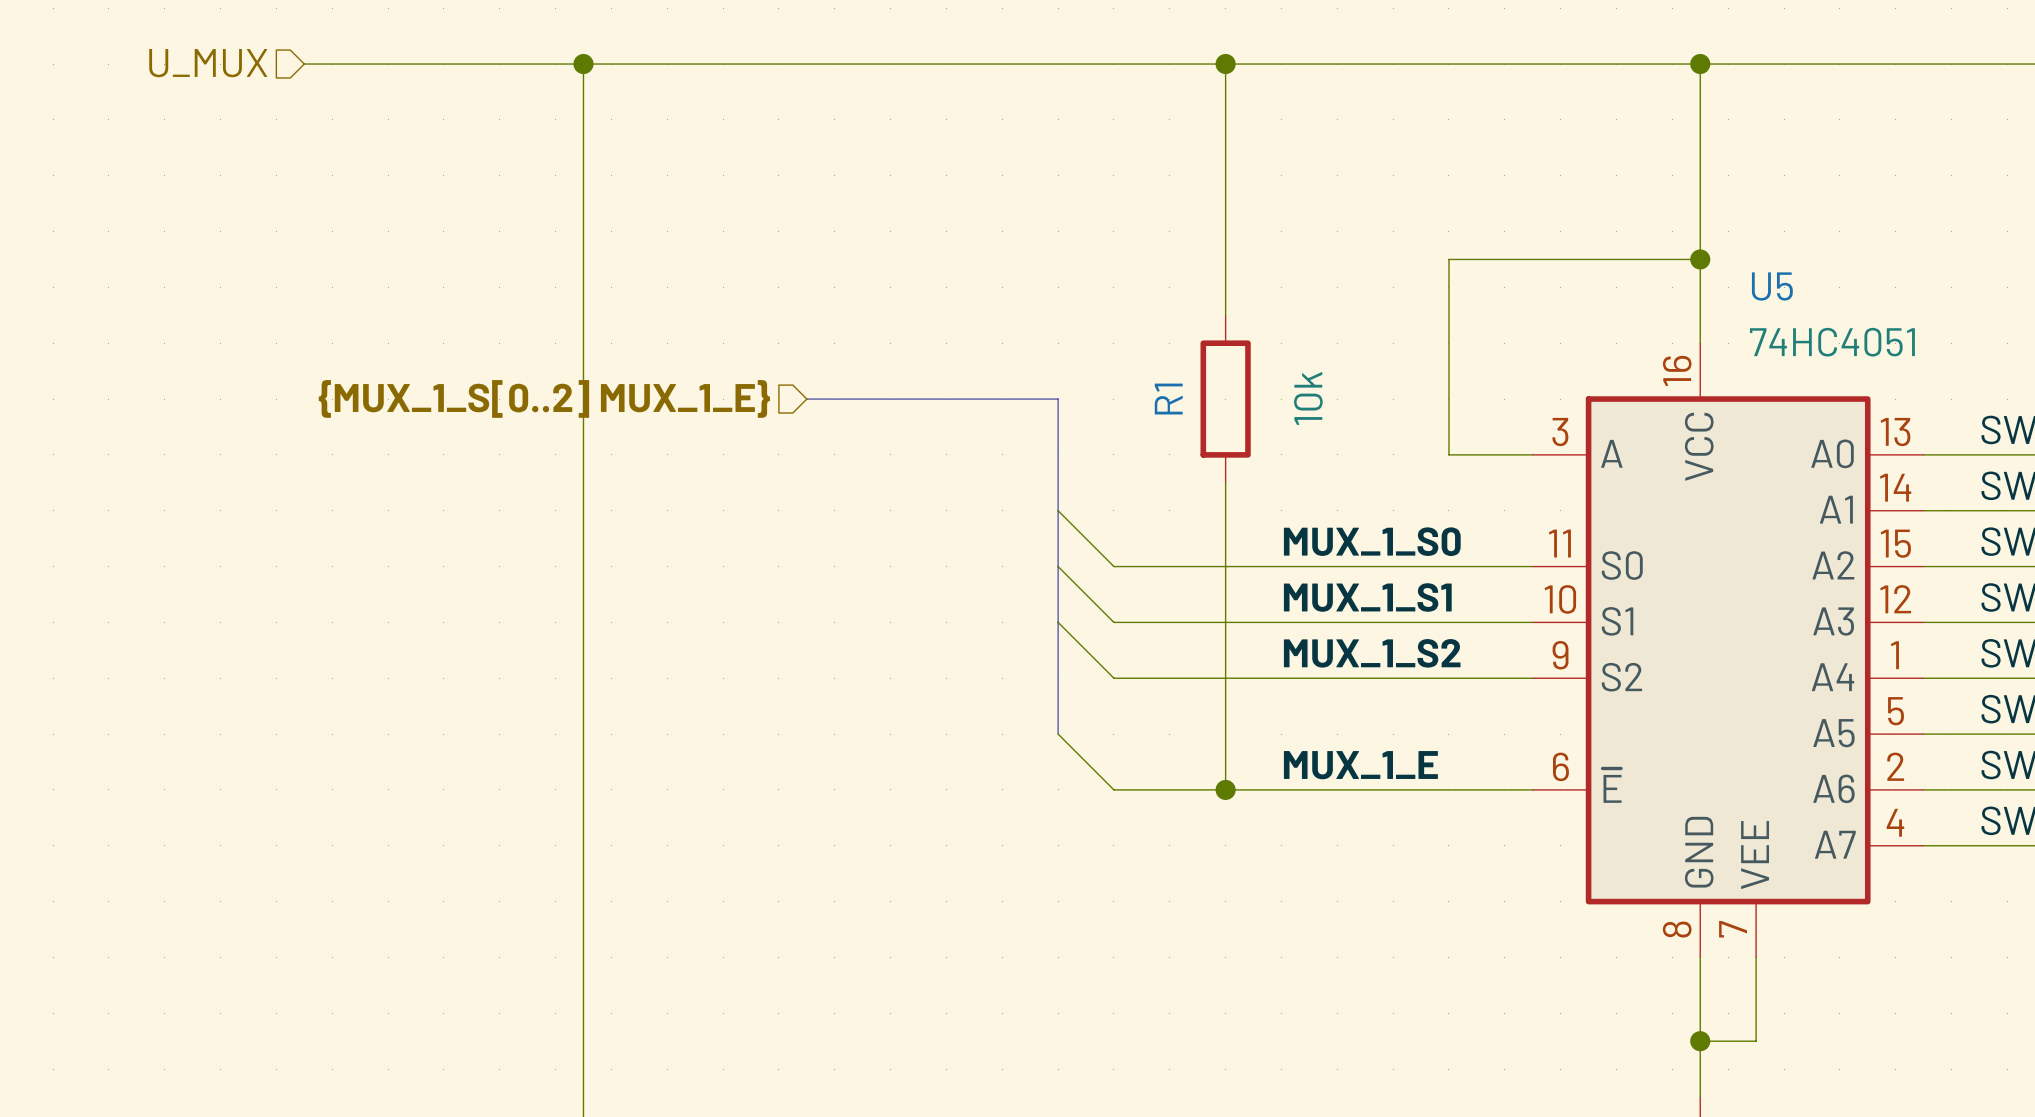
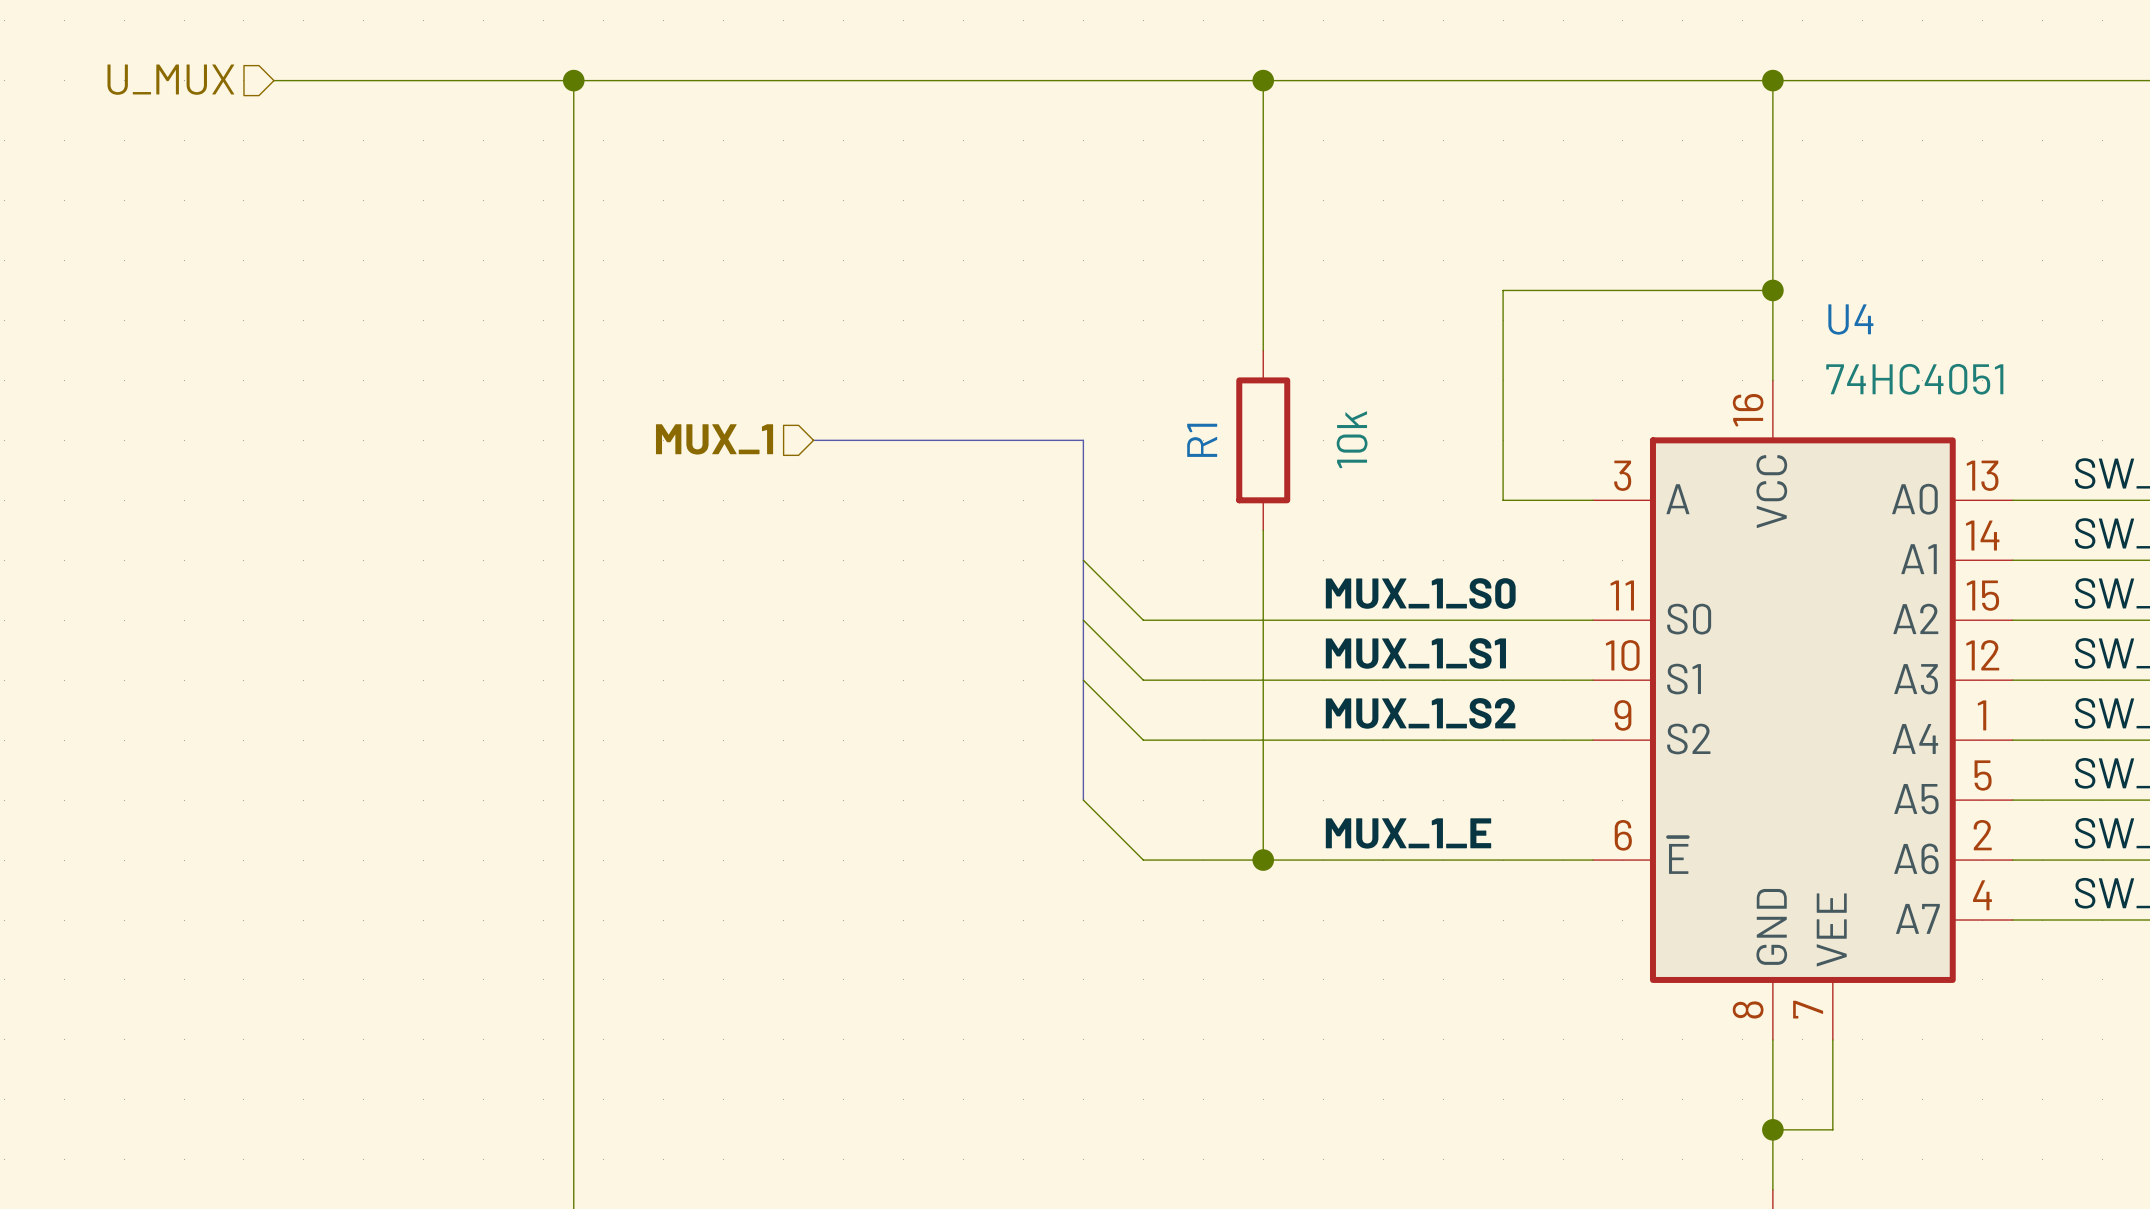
U5 name: U5 (1772, 286) -> U4 (1850, 319)
hierarchical label: {MUX_1_S[0..2] MUX_1_E} (544, 398) -> MUX_1 (714, 439)

